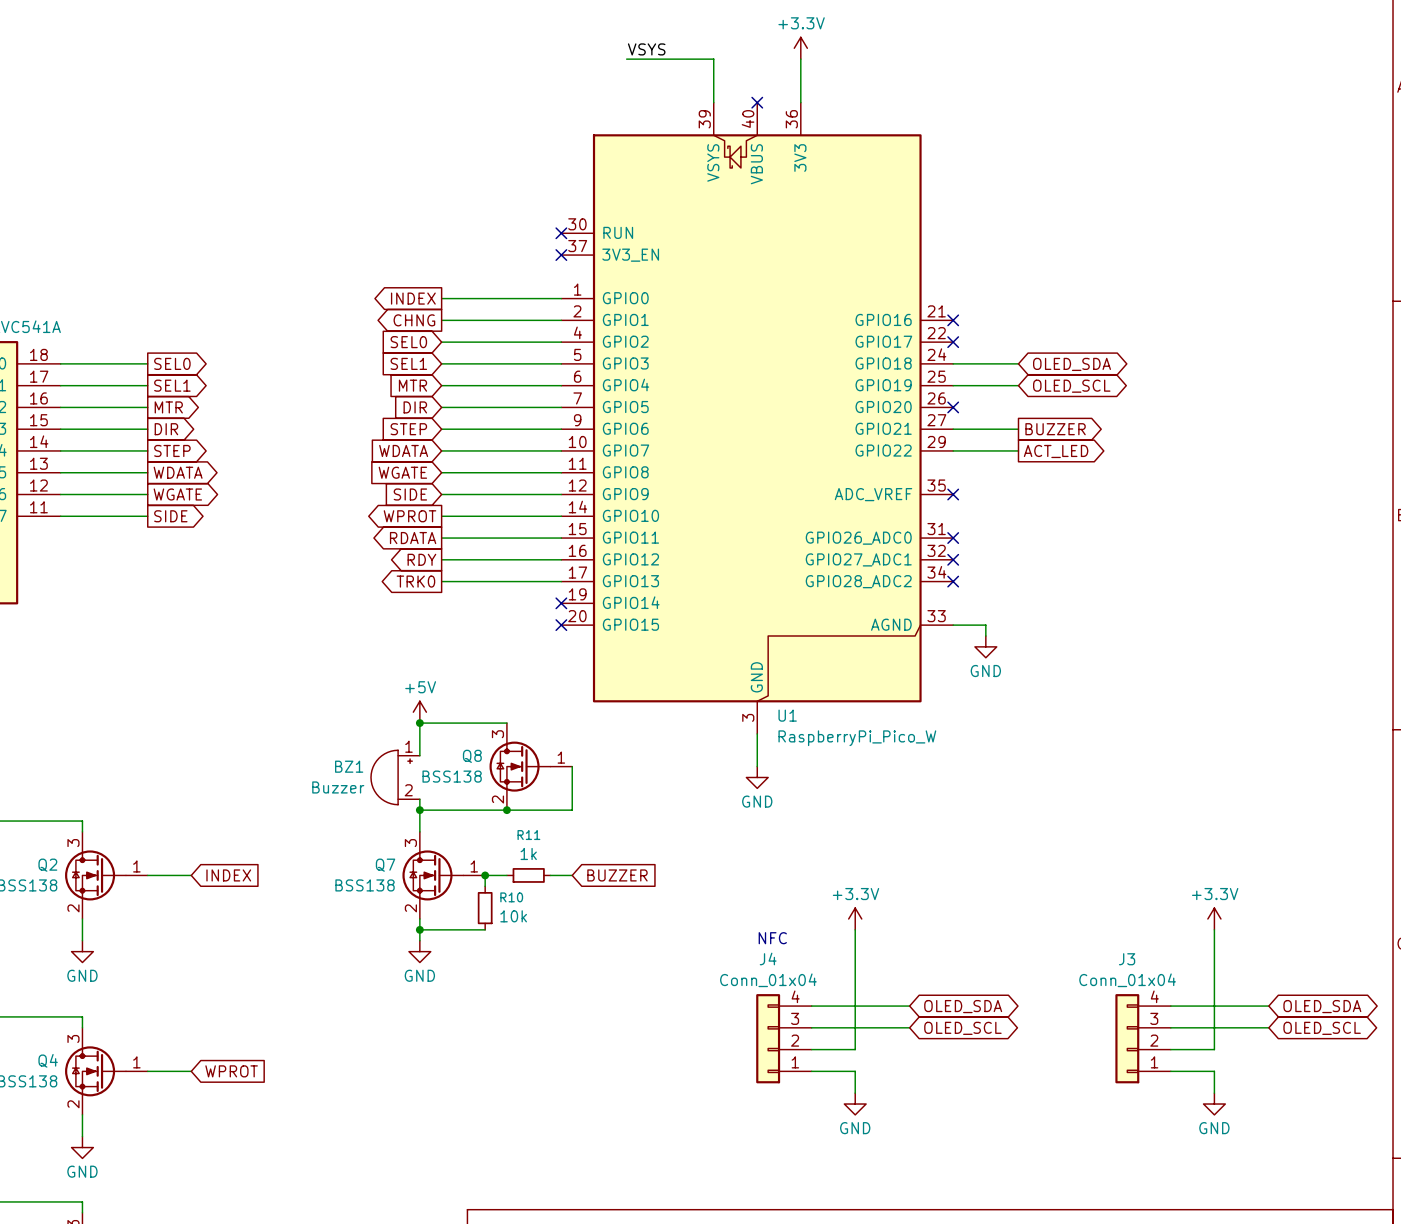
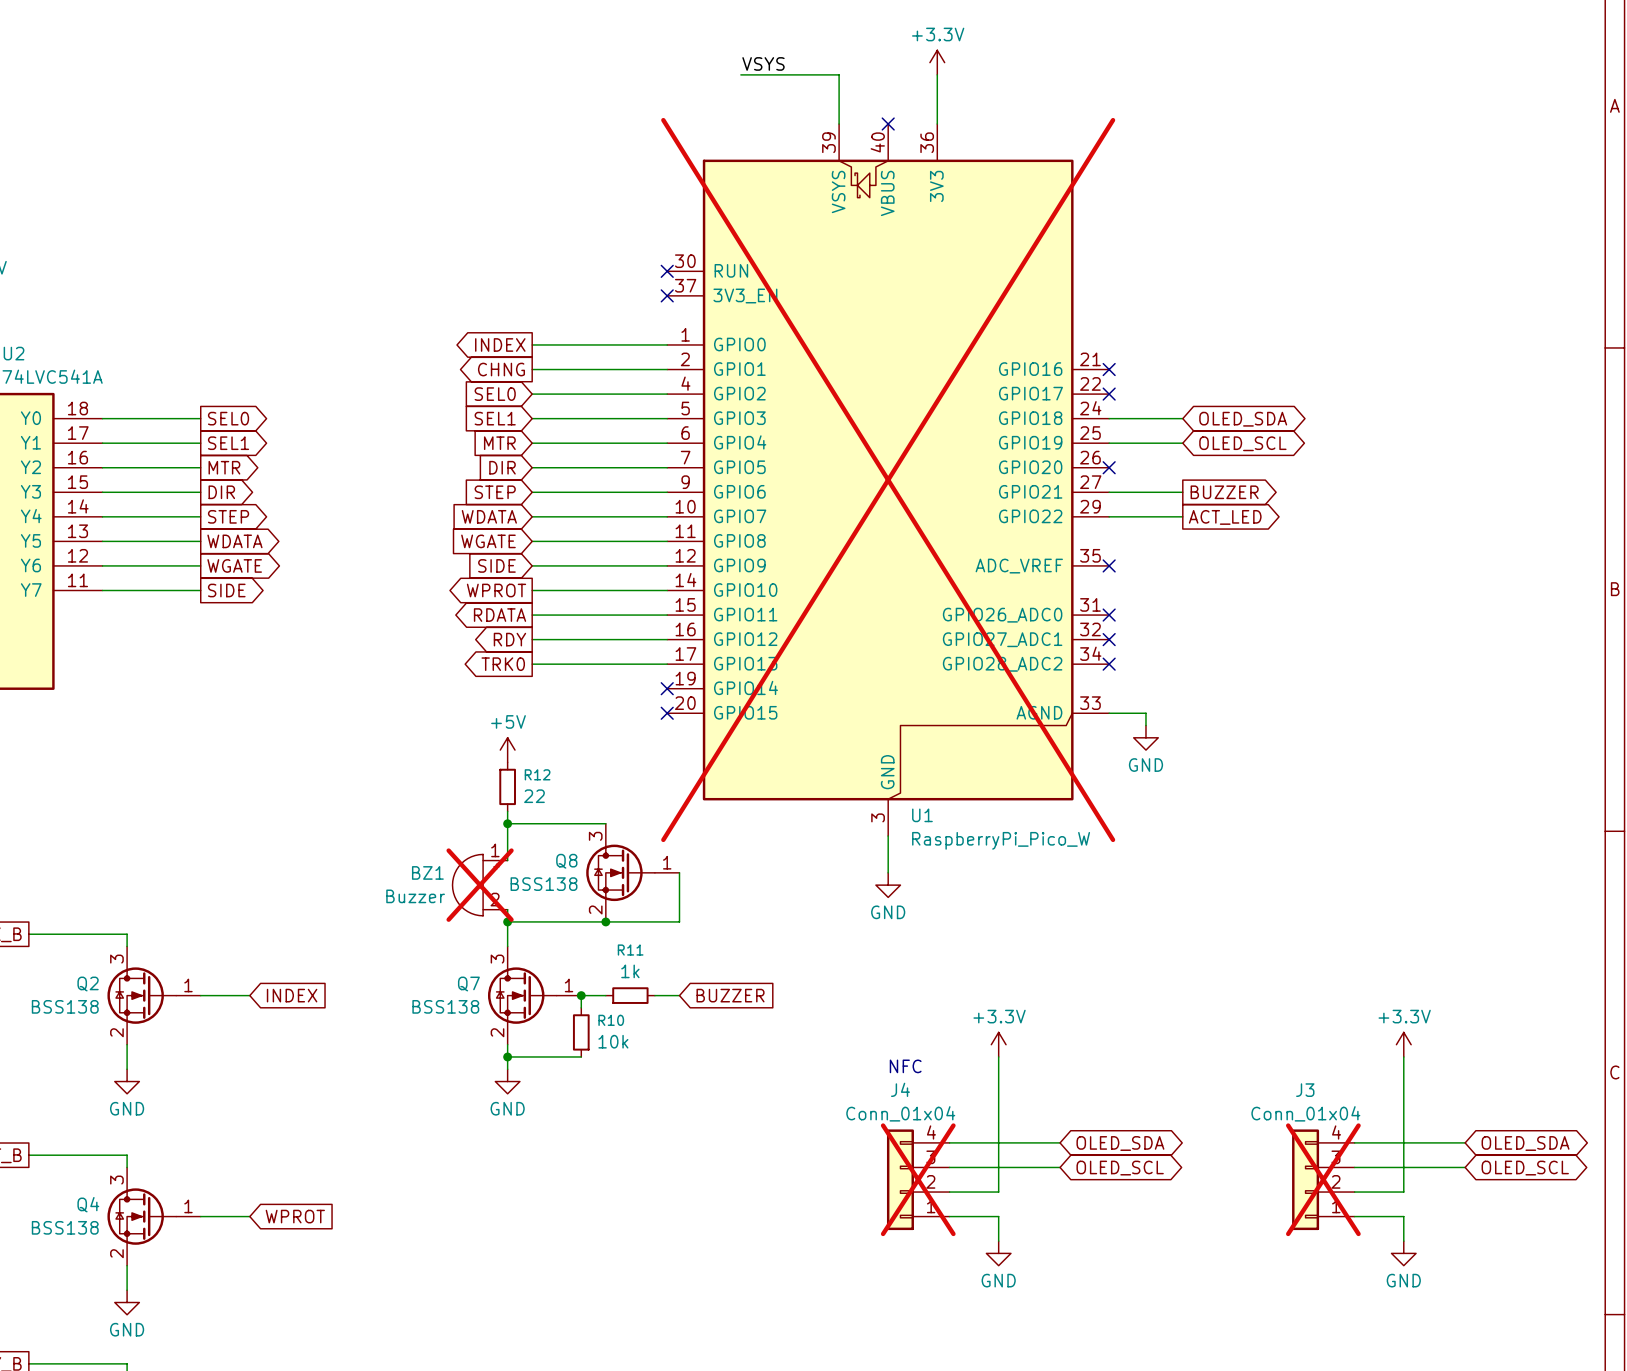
U1 do-not-place cross: none -> (888, 480)
R12: none -> 22 (507, 786)
power symbol position: +5V (419, 712) -> +5V (507, 750)
BZ1 do-not-place cross: none -> (480, 885)
J4 do-not-place cross: none -> (918, 1179)
J3 do-not-place cross: none -> (1323, 1179)

